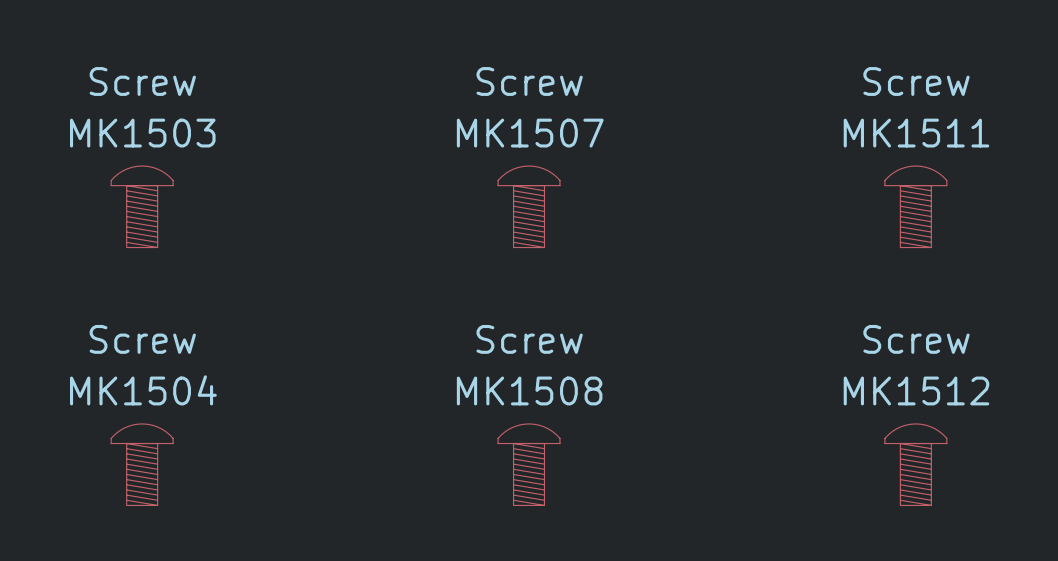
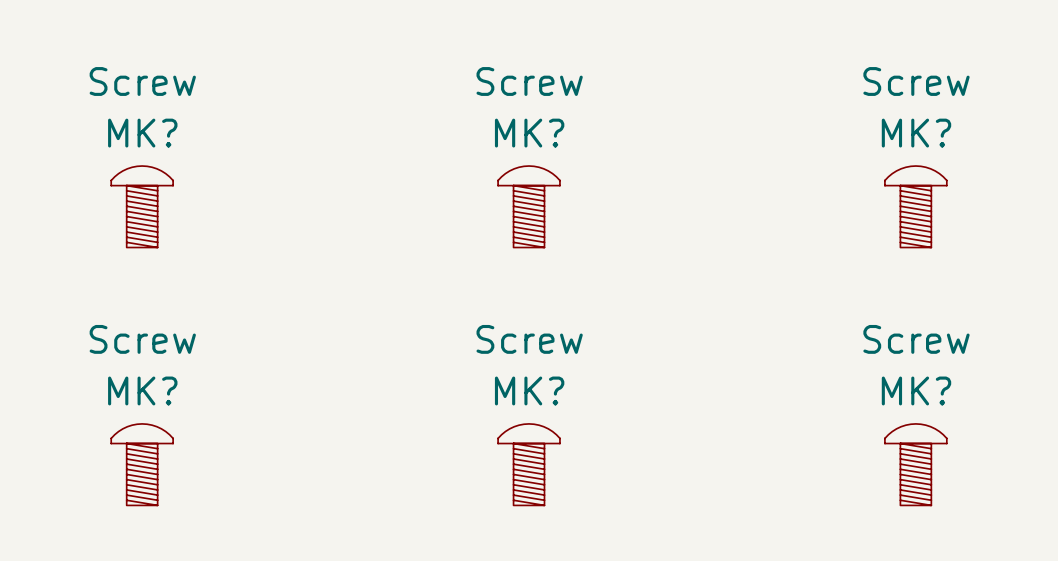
MK1503 name: MK1503 (142, 133) -> MK? (142, 133)
MK1507 name: MK1507 (530, 133) -> MK? (529, 133)
MK1511 name: MK1511 (916, 133) -> MK? (916, 133)
MK1504 name: MK1504 (143, 390) -> MK? (142, 390)
MK1508 name: MK1508 (529, 390) -> MK? (529, 390)
MK1512 name: MK1512 (916, 390) -> MK? (916, 390)

